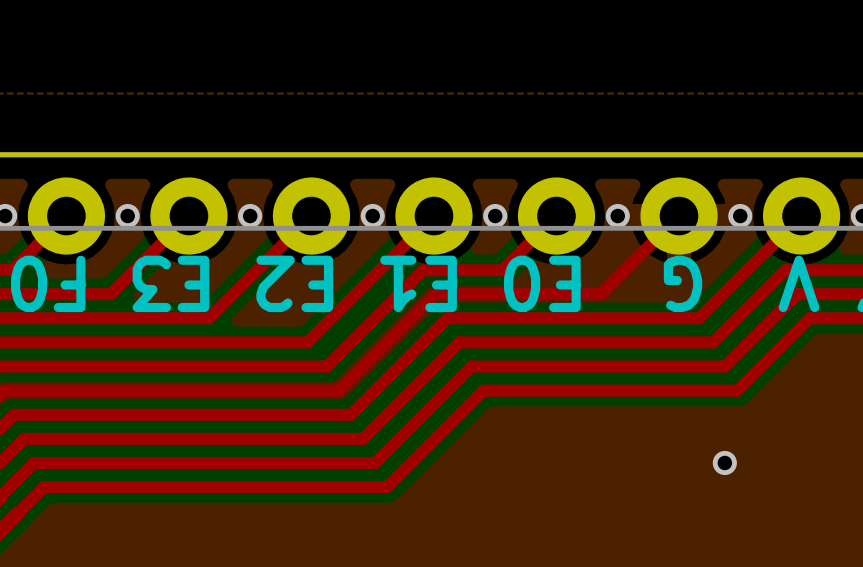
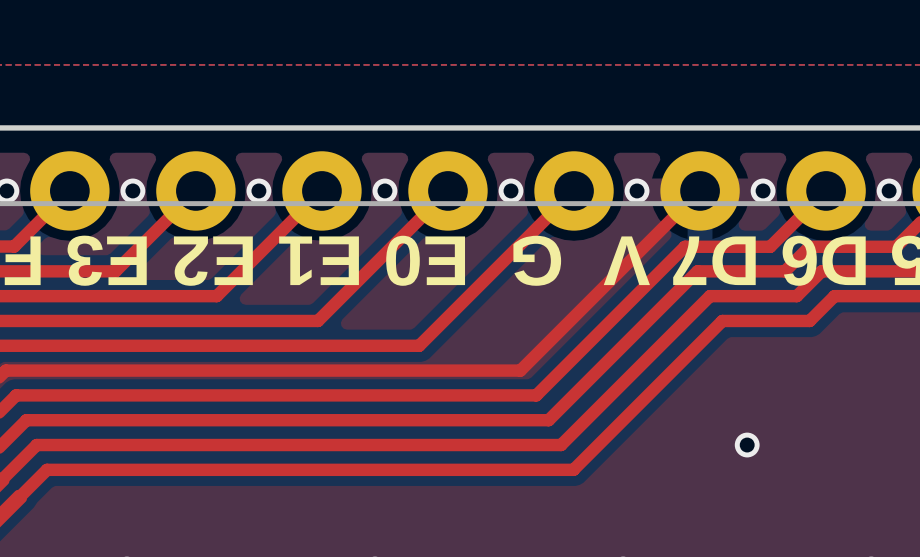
top track: (502, 270) (423, 270) (326, 366) -> (518, 246) (419, 345) (337, 345)
top track: (747, 270) (699, 318) -> (796, 296) (720, 296)
top track: none -> (770, 246) (684, 246) (536, 395) (362, 395)
top track: (600, 294) (435, 294) (338, 390) -> (619, 271) (520, 370)
top track: (761, 294) (713, 342) -> (809, 320) (735, 320)
top track: none -> (784, 271) (697, 271) (548, 420) (375, 420)
top track: (688, 318) (447, 318) (351, 414) -> (709, 296) (561, 445) (387, 445)
top track: (773, 318) (724, 366) (471, 366) (375, 462) -> none
top track: (700, 342) (459, 342) (363, 438) -> (722, 320) (573, 469) (399, 469)
top track: (785, 342) (737, 390) (504, 390) -> none
top track: (483, 390) (387, 487) -> (499, 370) (350, 370)

